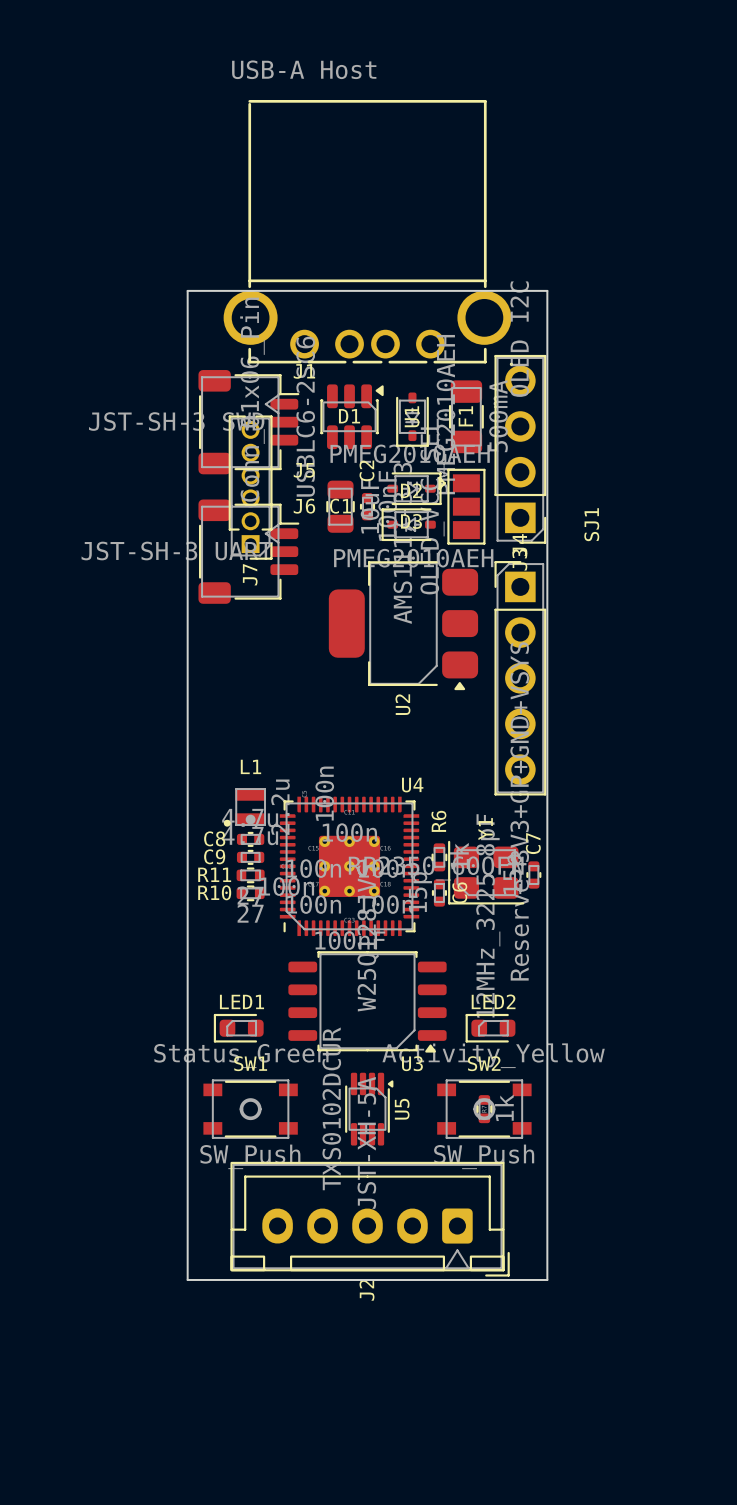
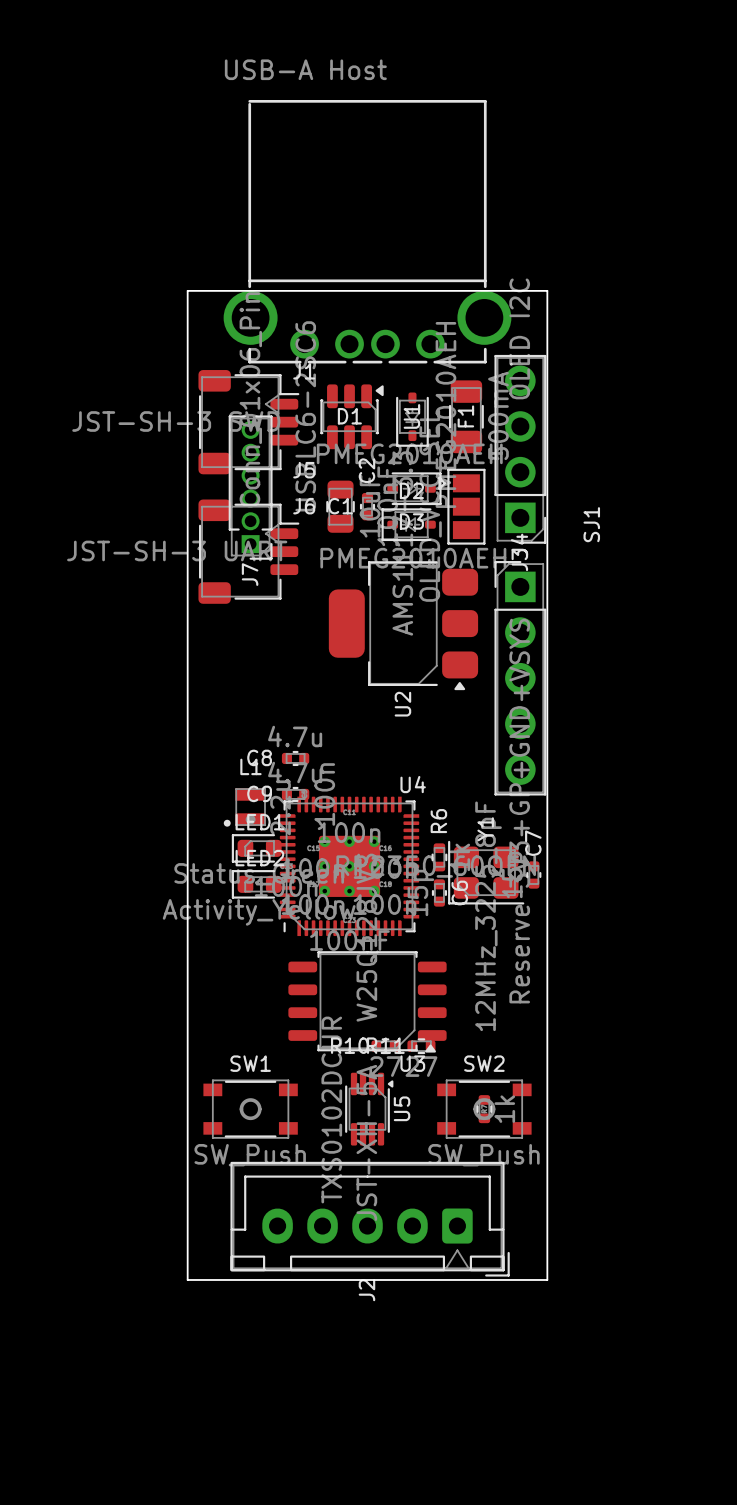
C8 position: (250, 839) -> (295, 758)
C9 position: (250, 857) -> (295, 794)
R11 position: (250, 875) -> (421, 1046)
R10 position: (250, 893) -> (385, 1046)
LED1 position: (238, 1028) -> (256, 848)
LED2 position: (490, 1028) -> (256, 884)

